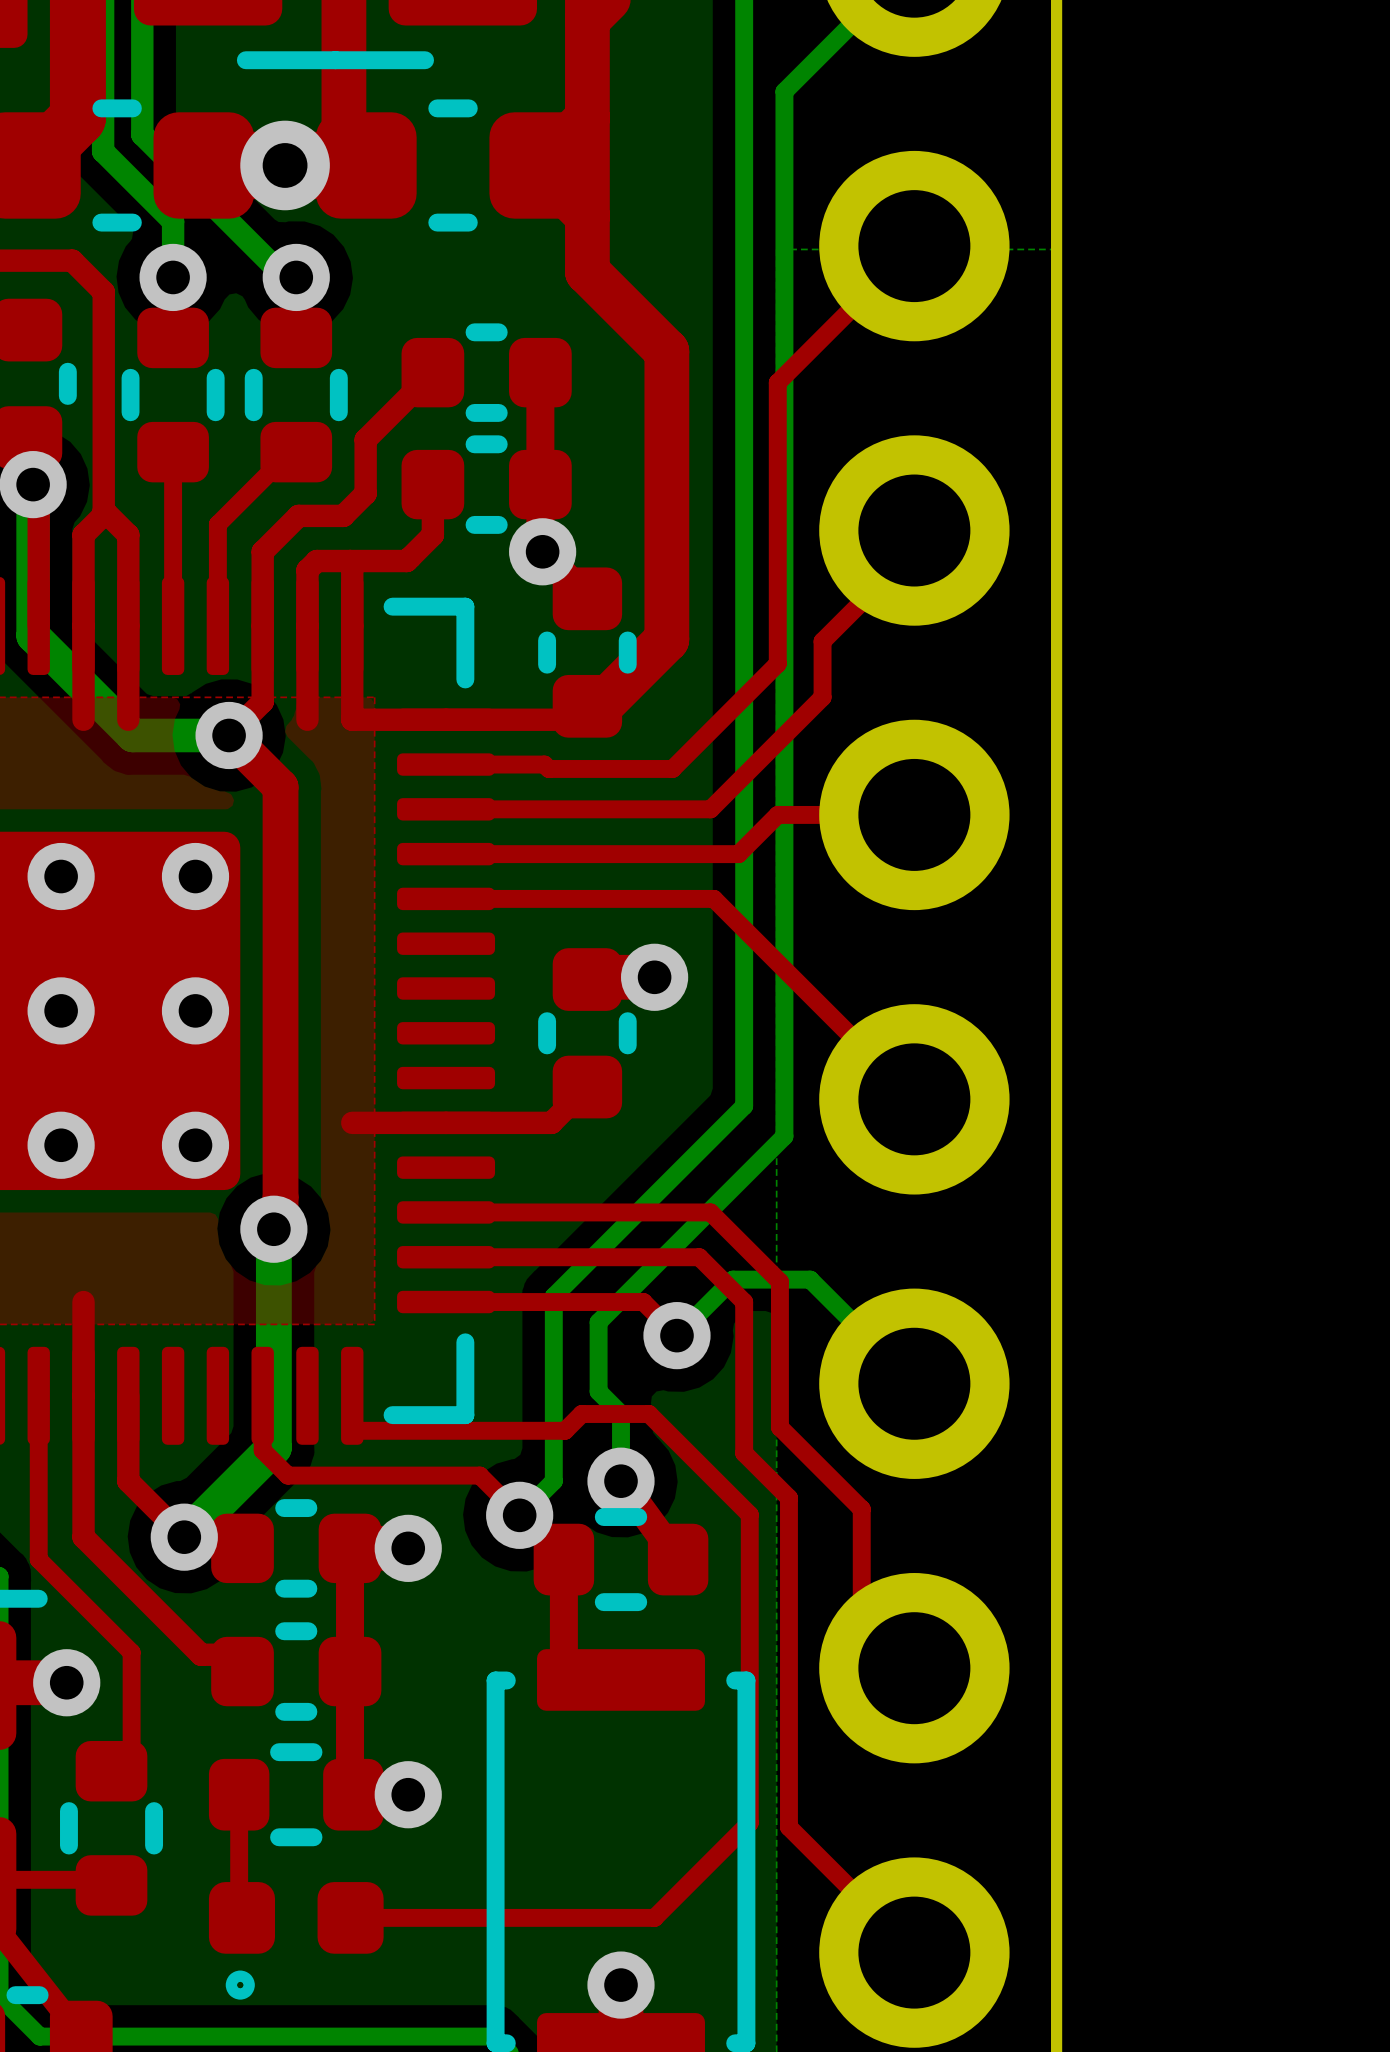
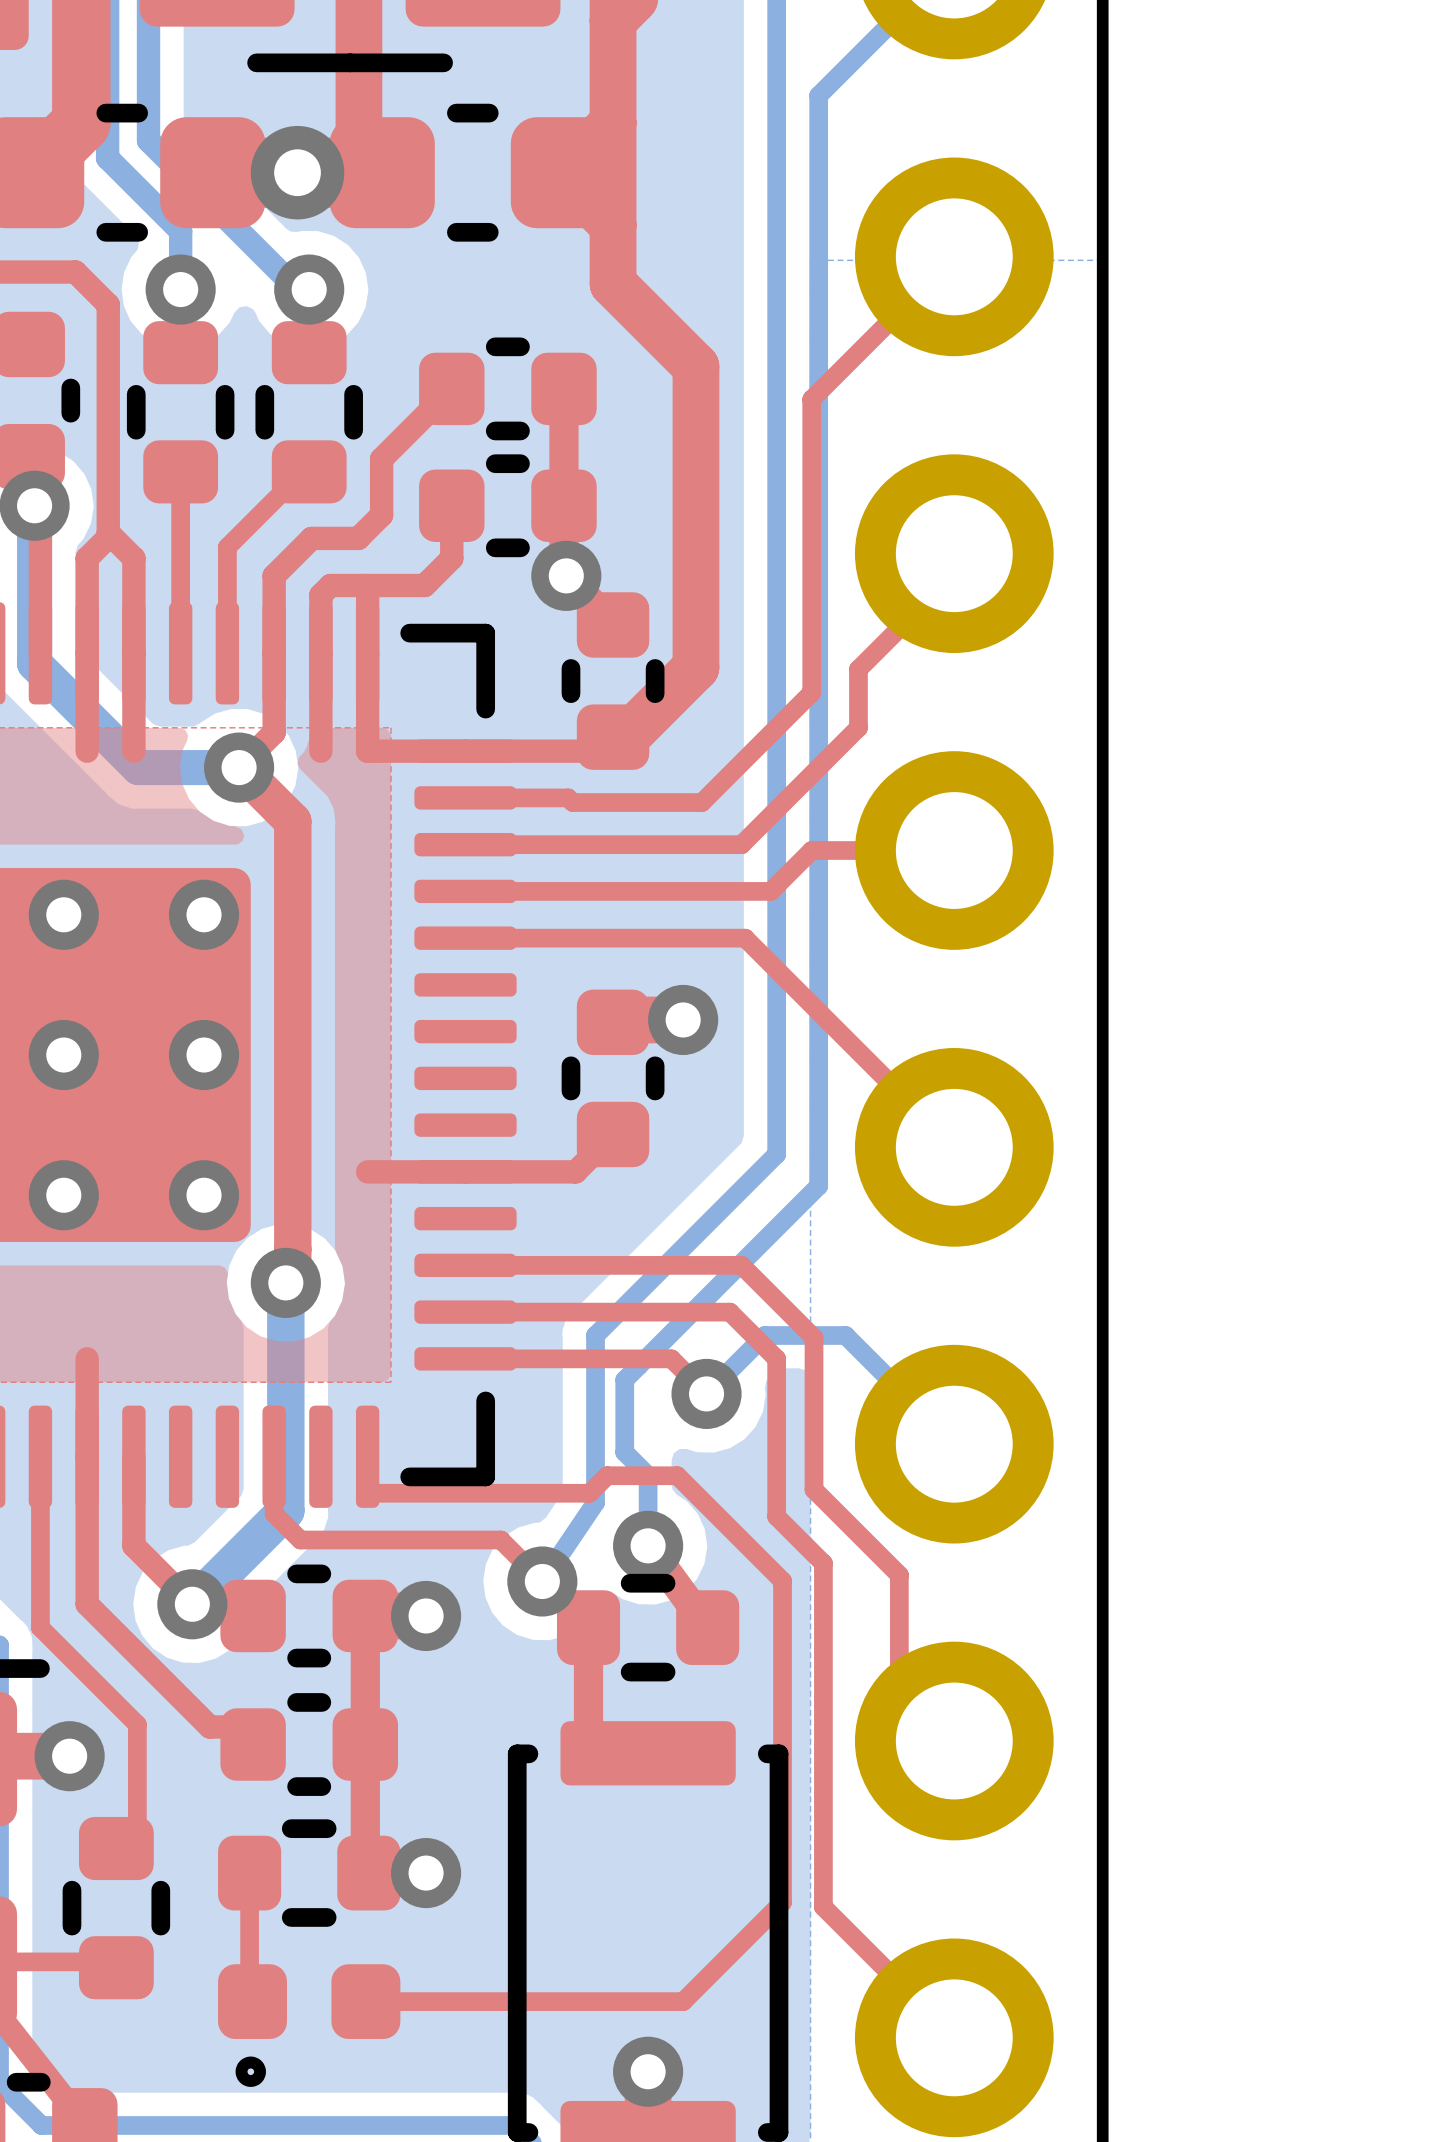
bottom track: (570, 1279) (553, 1296) (553, 1481) (519, 1515) -> (595, 1335) (595, 1502) (542, 1581)

